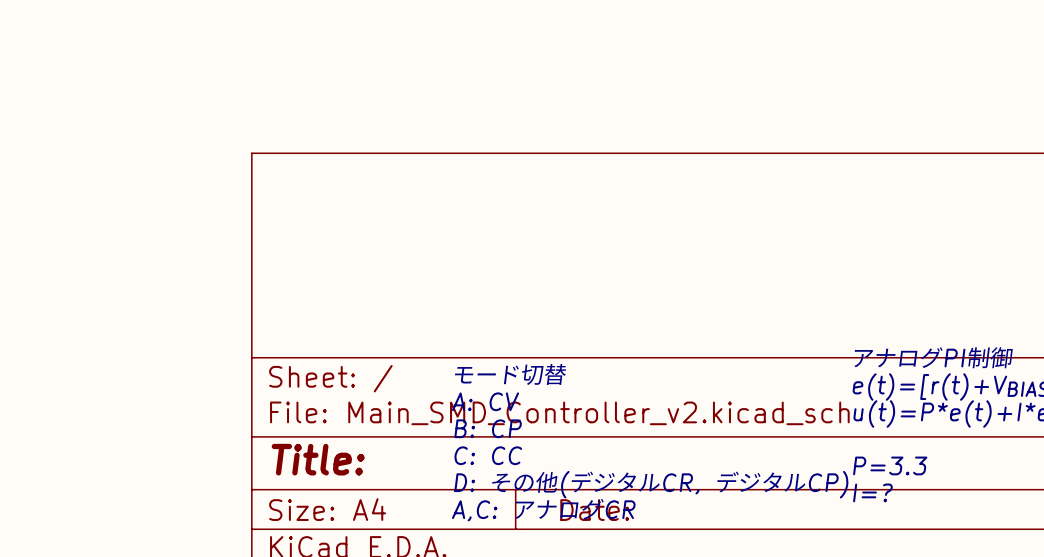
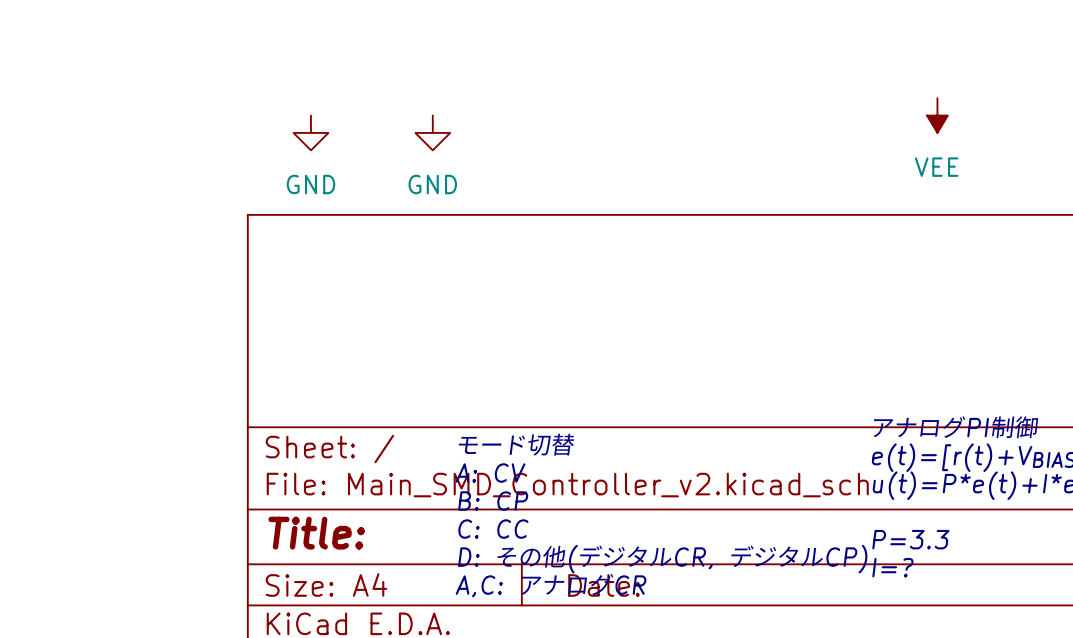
power symbol: none -> VEE (937, 115)
power symbol: none -> GND (310, 132)
power symbol: none -> GND (432, 132)

